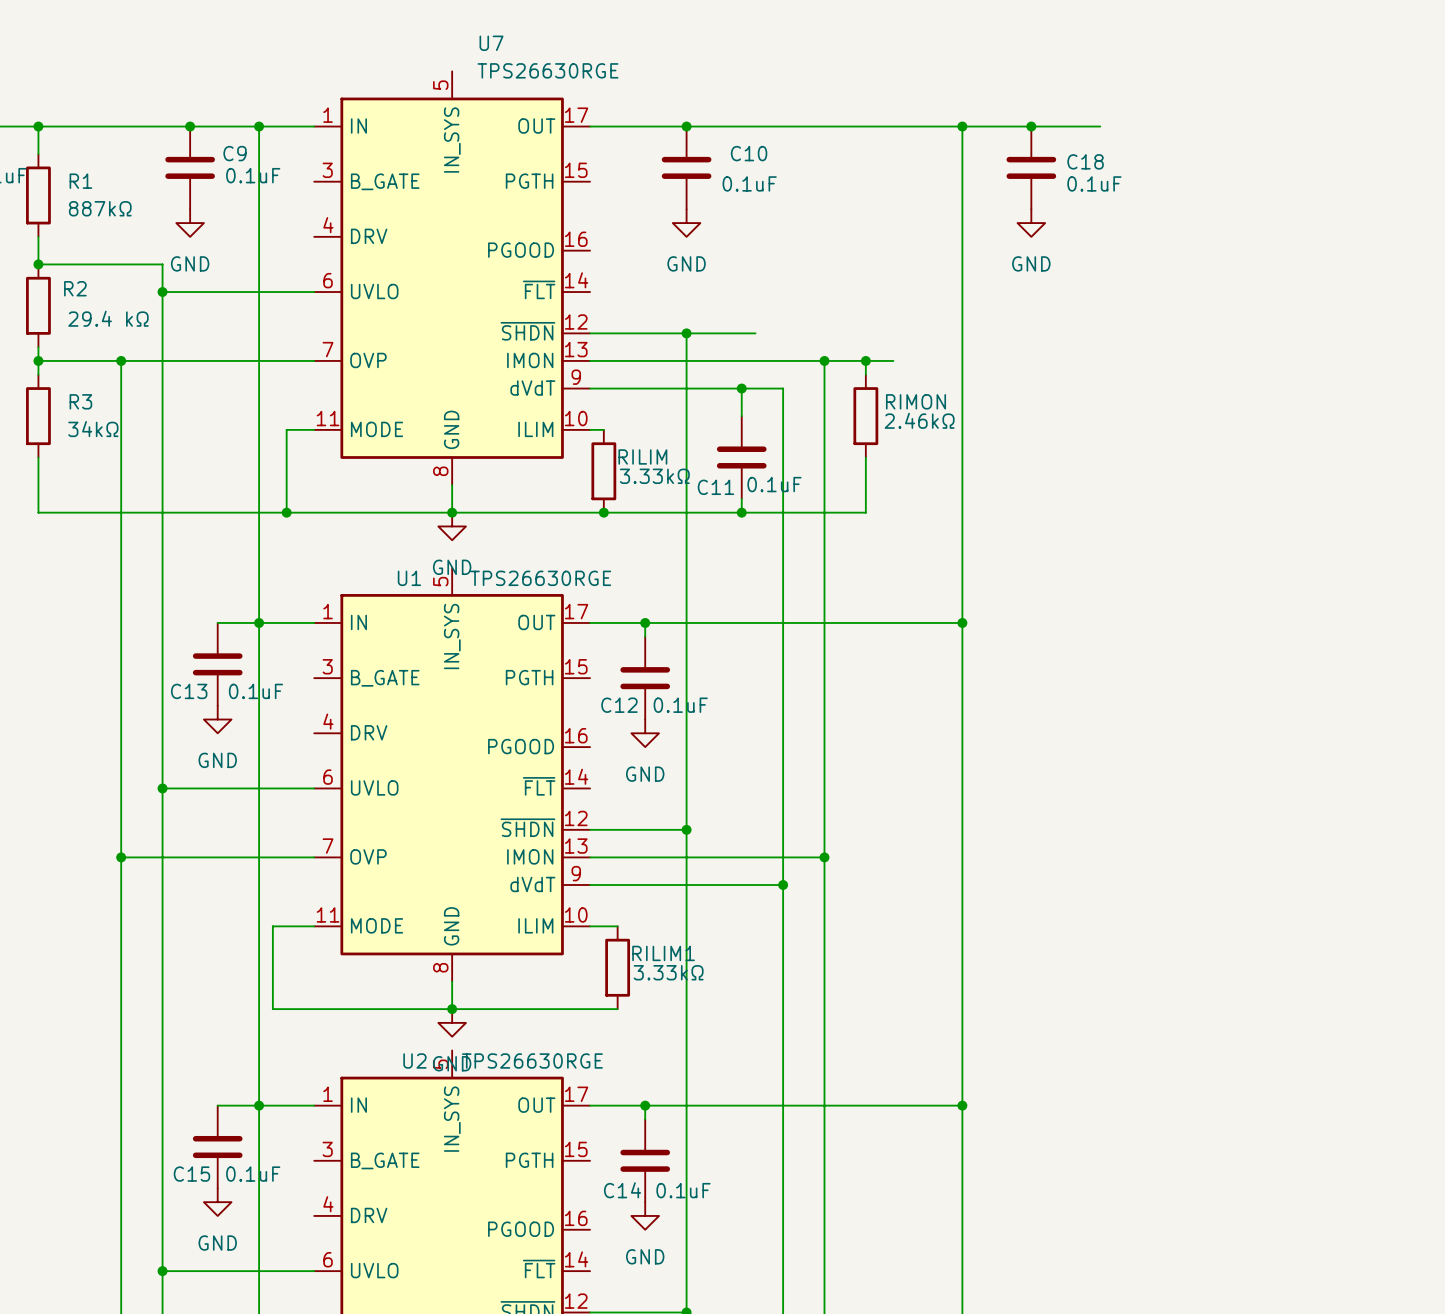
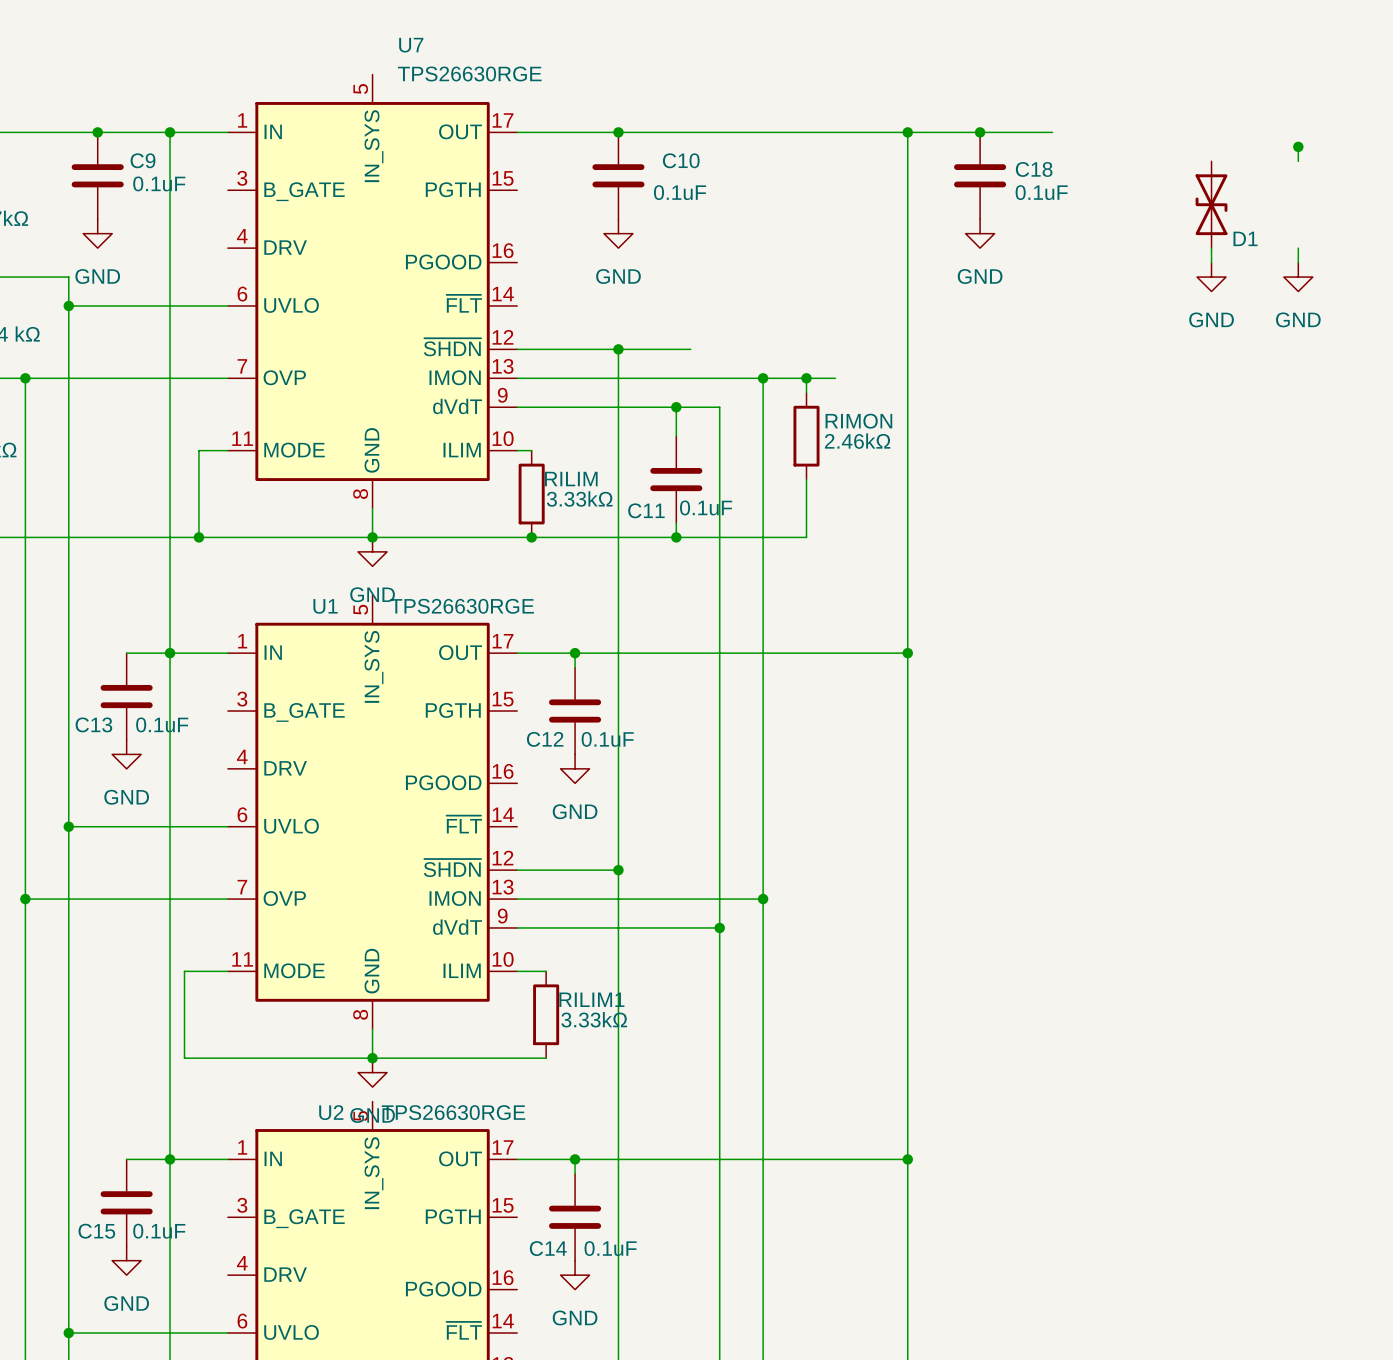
wire: none -> (1298, 146) (1298, 161)
junction: none -> (1298, 146)
D1: none -> (1211, 204)
wire: none -> (1211, 248) (1211, 262)
wire: none -> (1298, 248) (1298, 262)
power symbol: none -> GND (1211, 277)
power symbol: none -> GND (1298, 277)

